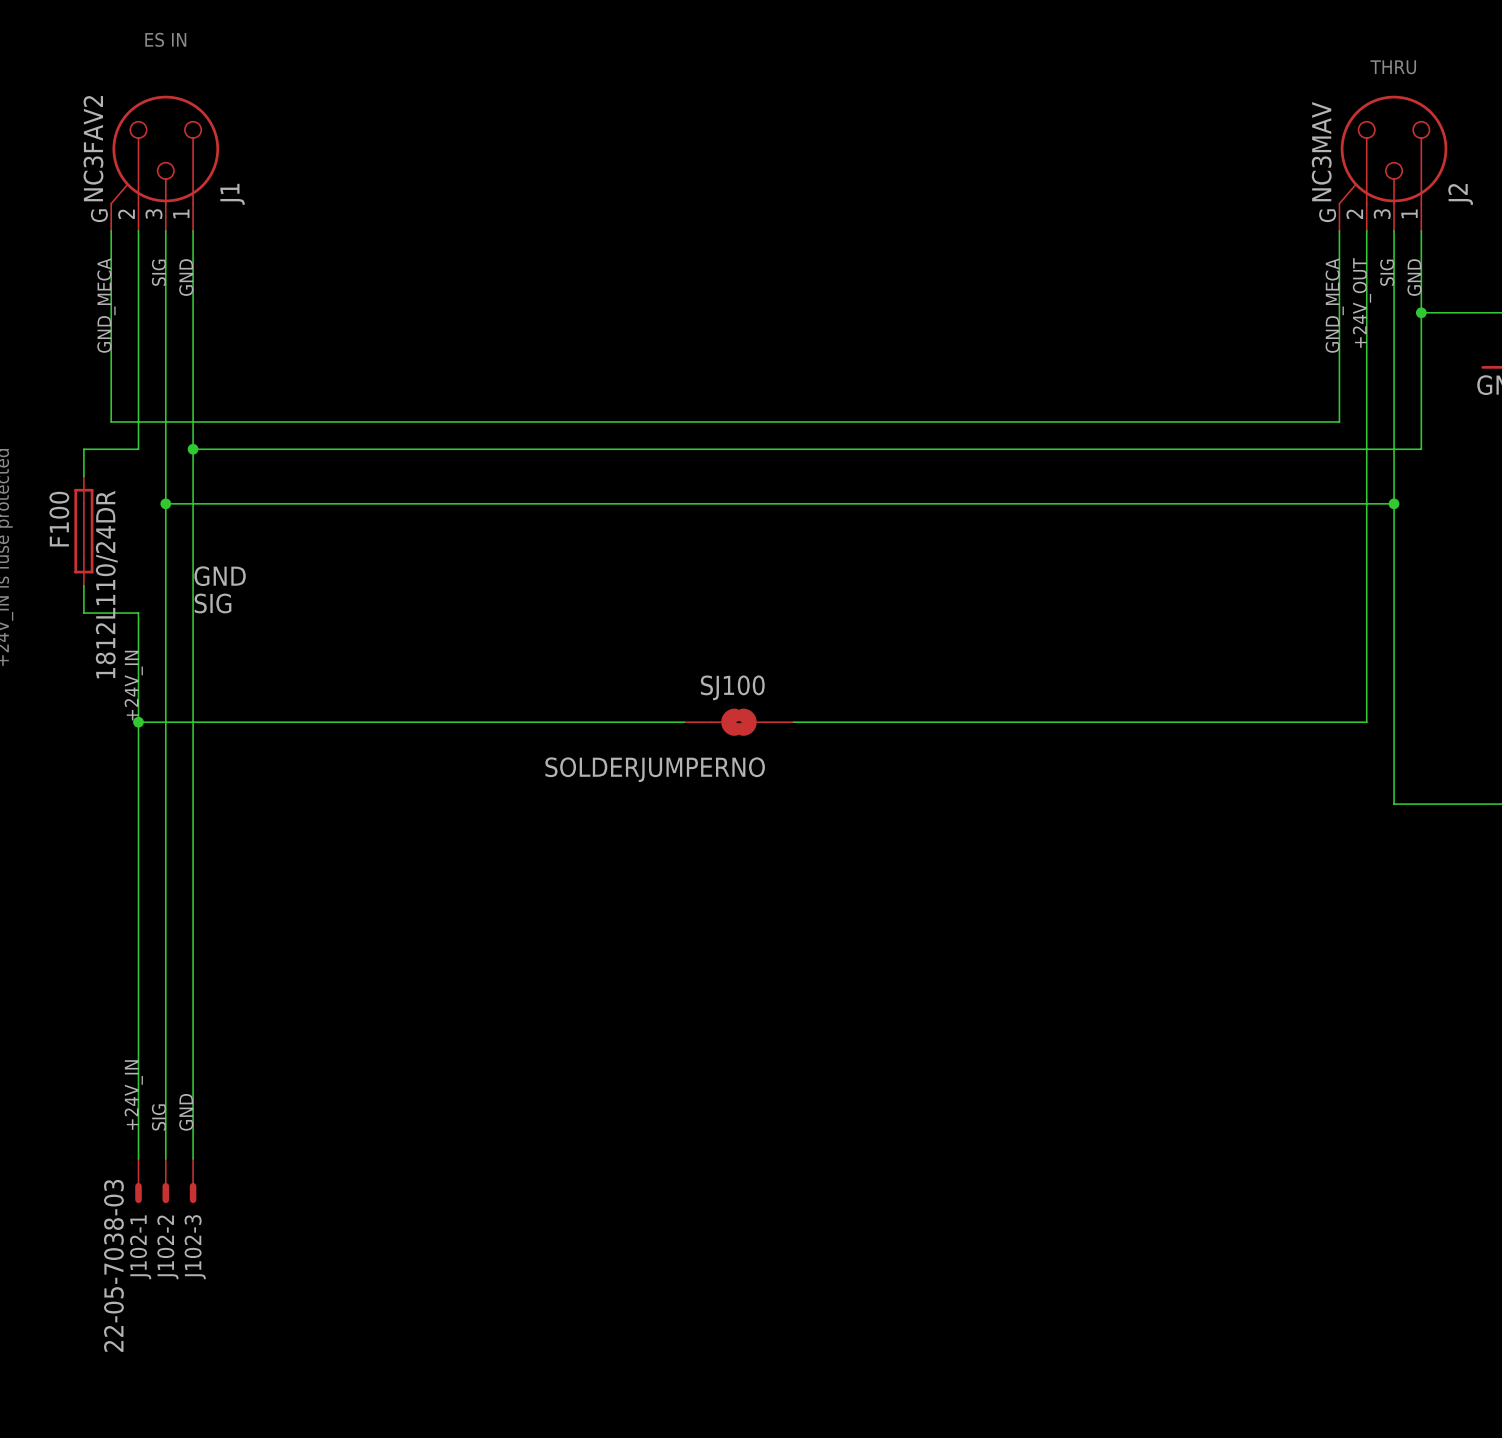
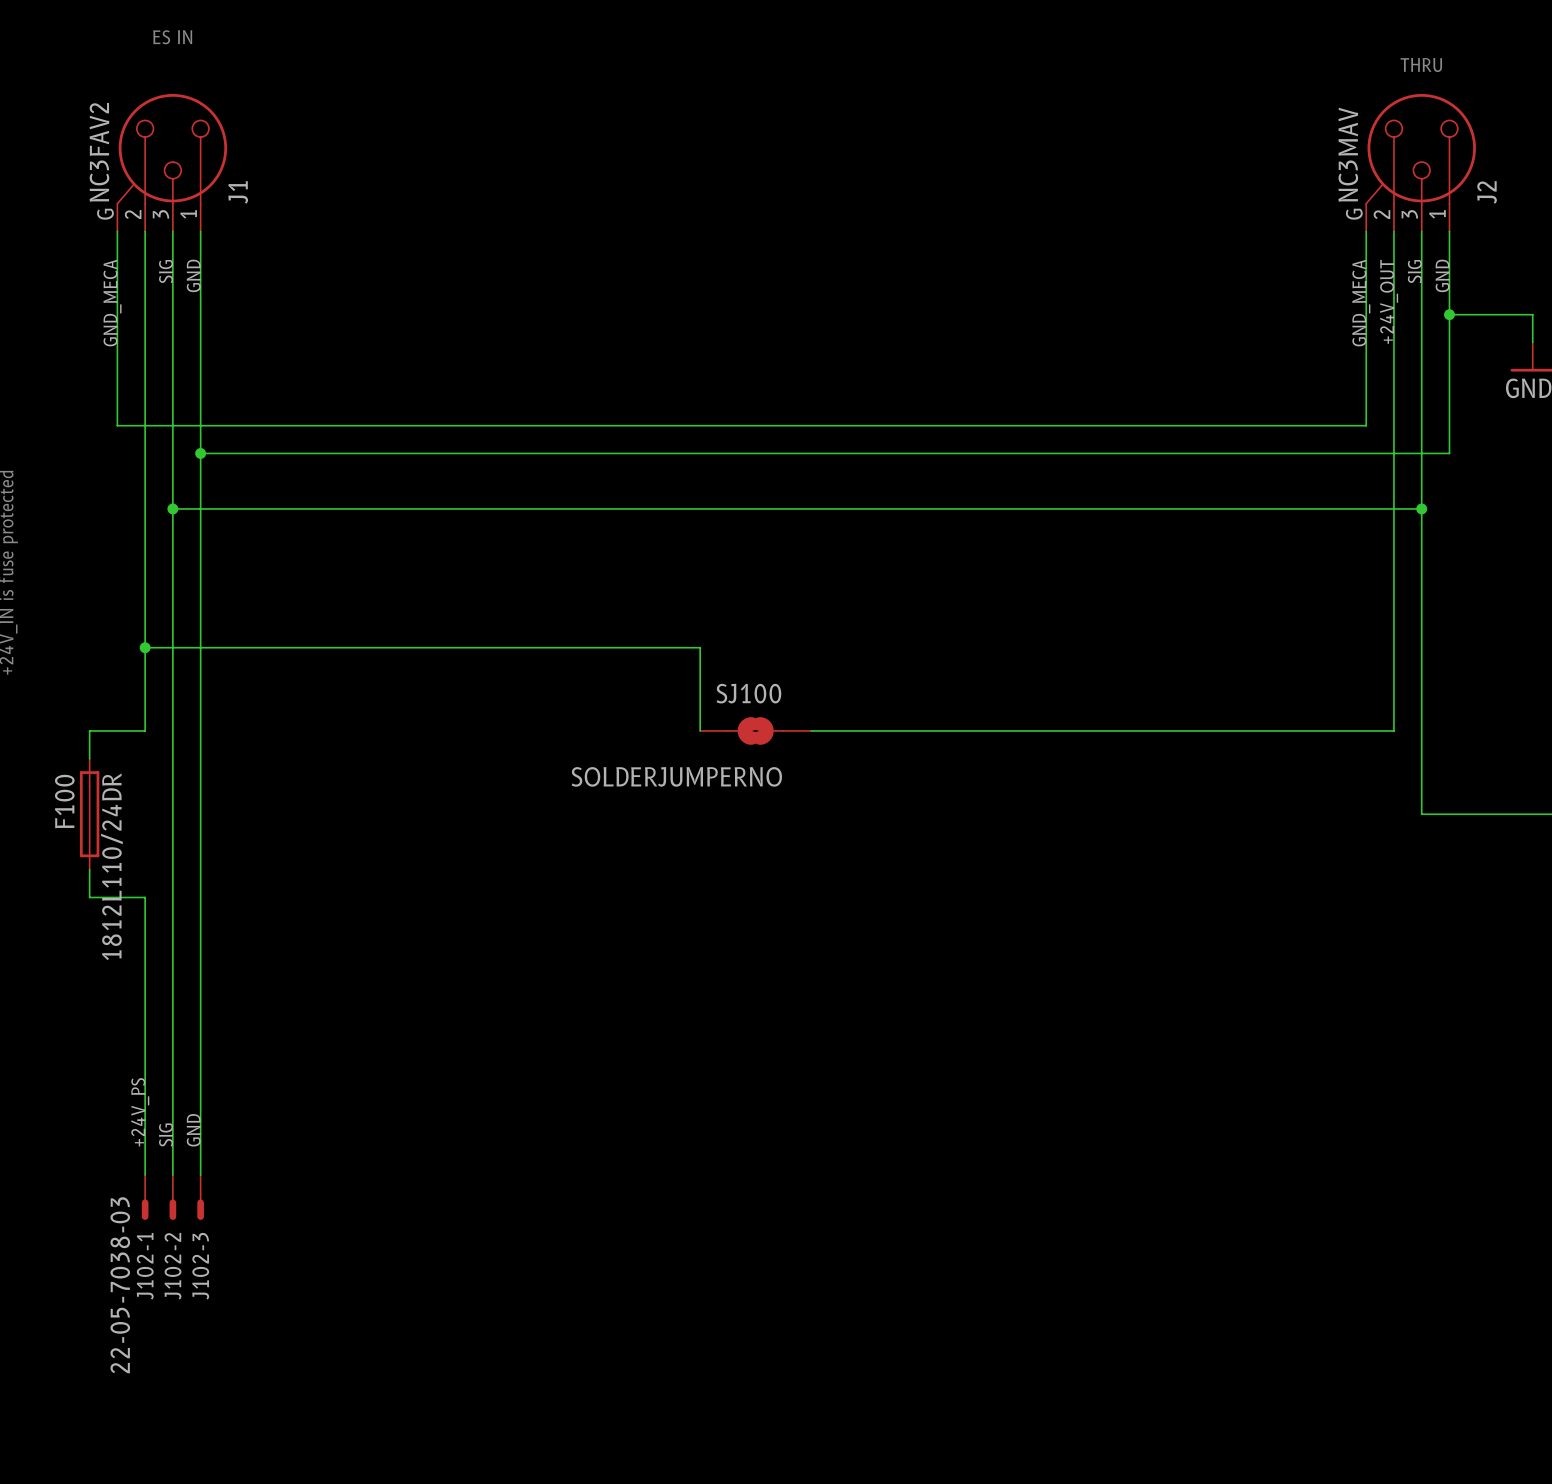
wire: (138, 449) (83, 449) (83, 476) -> (145, 453) (145, 619)
F100 position: (83, 531) -> (89, 814)
label: GND (220, 576) -> none
wire: (83, 585) (83, 613) (138, 613) -> none
label: SIG (212, 603) -> none
junction: none -> (145, 647)
label: +24V_IN (133, 685) -> none
wire: none -> (145, 730) (89, 730) (89, 758)
junction: (138, 722) -> none
wire: (684, 722) (138, 722) (138, 885) -> (700, 730) (700, 647) (145, 647)
wire: none -> (89, 869) (89, 897) (145, 897)
label: +24V_IN (133, 1095) -> +24V_PS (140, 1112)

